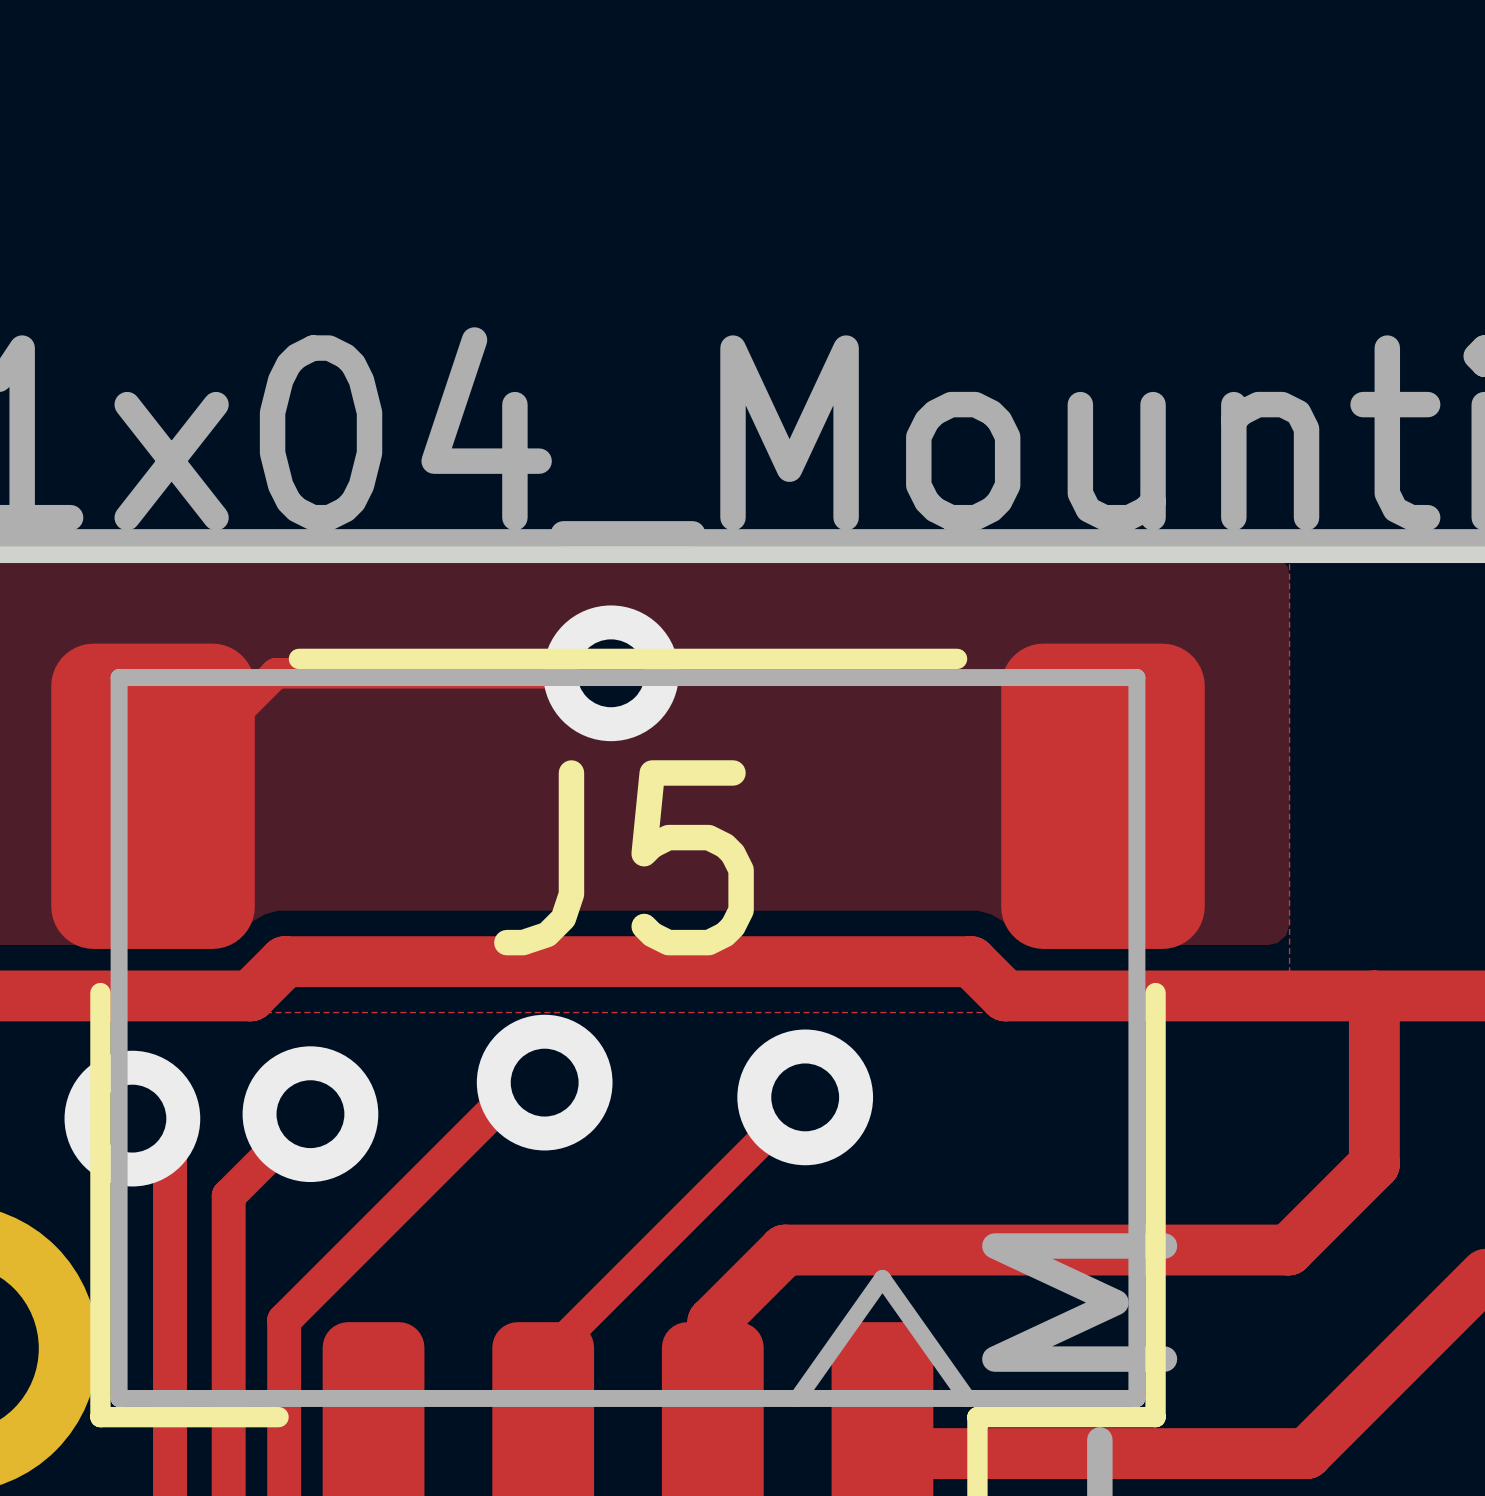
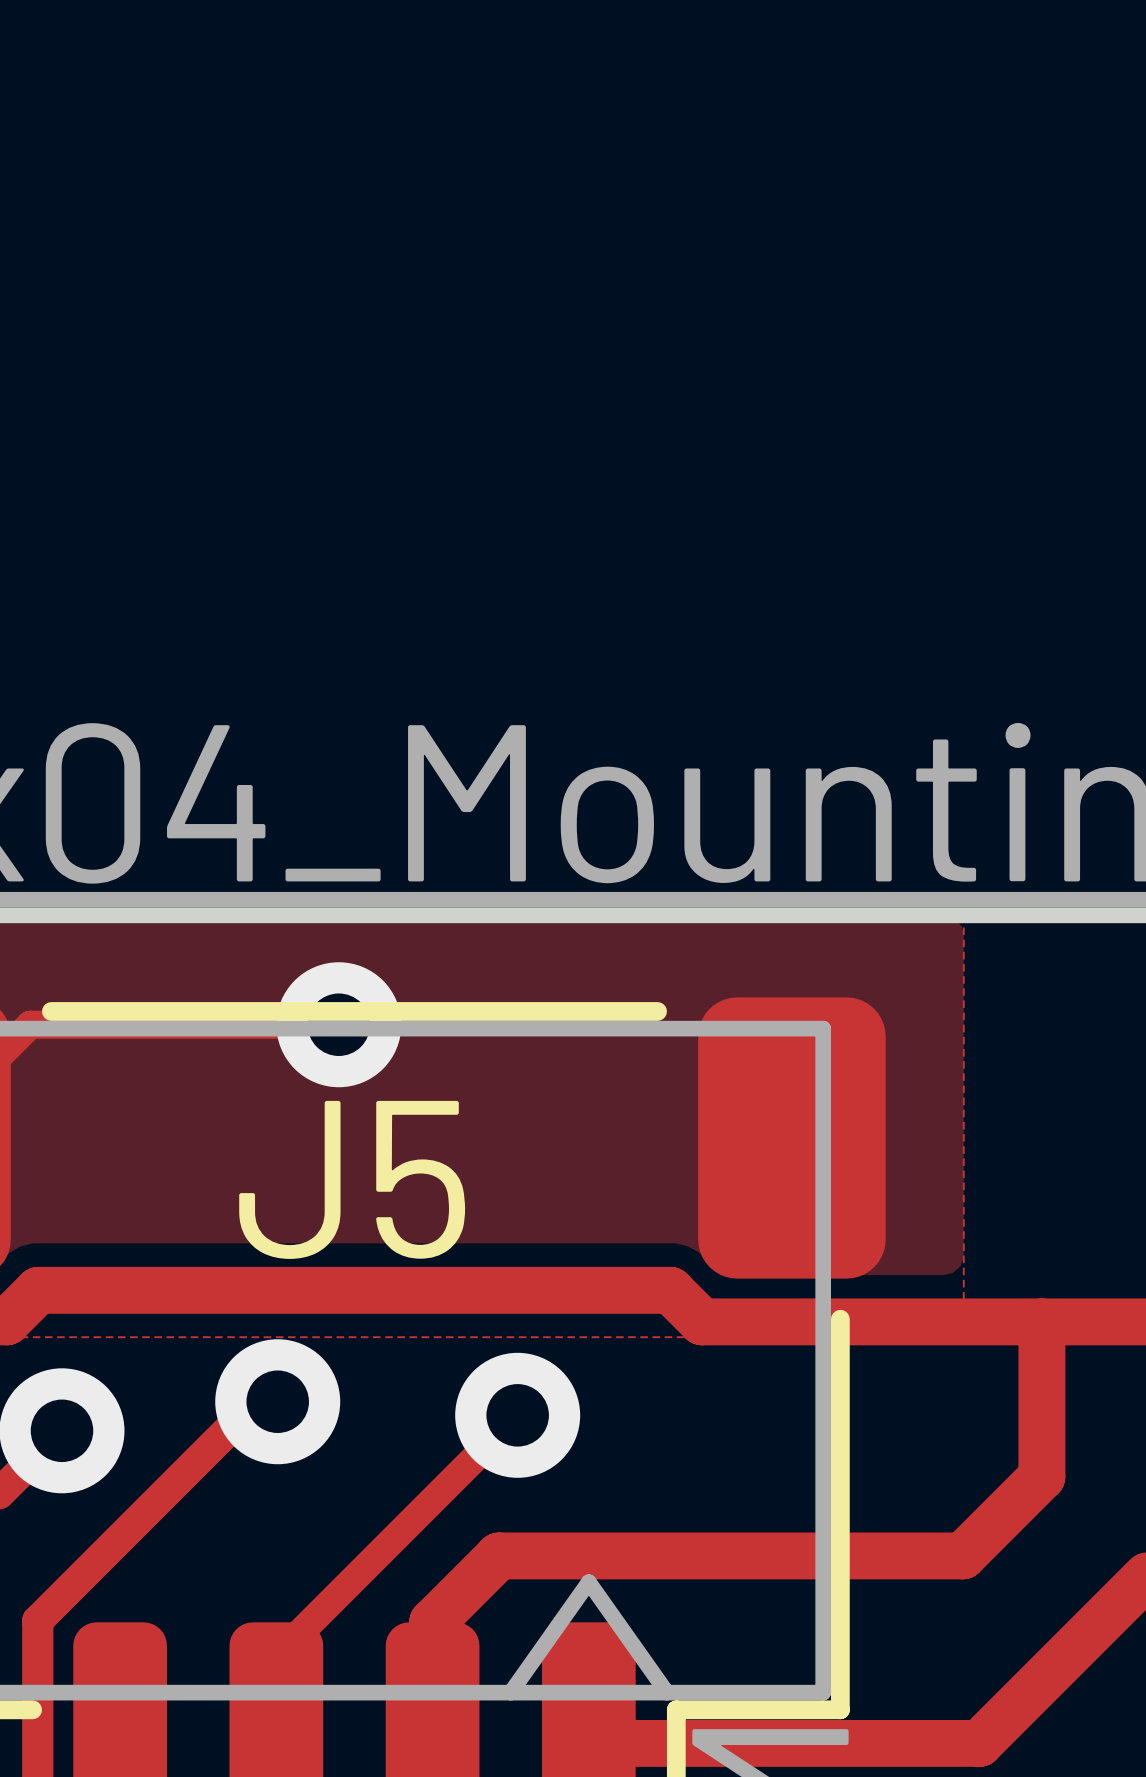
J5 name position: J5 (623, 857) -> J5 (352, 1179)

